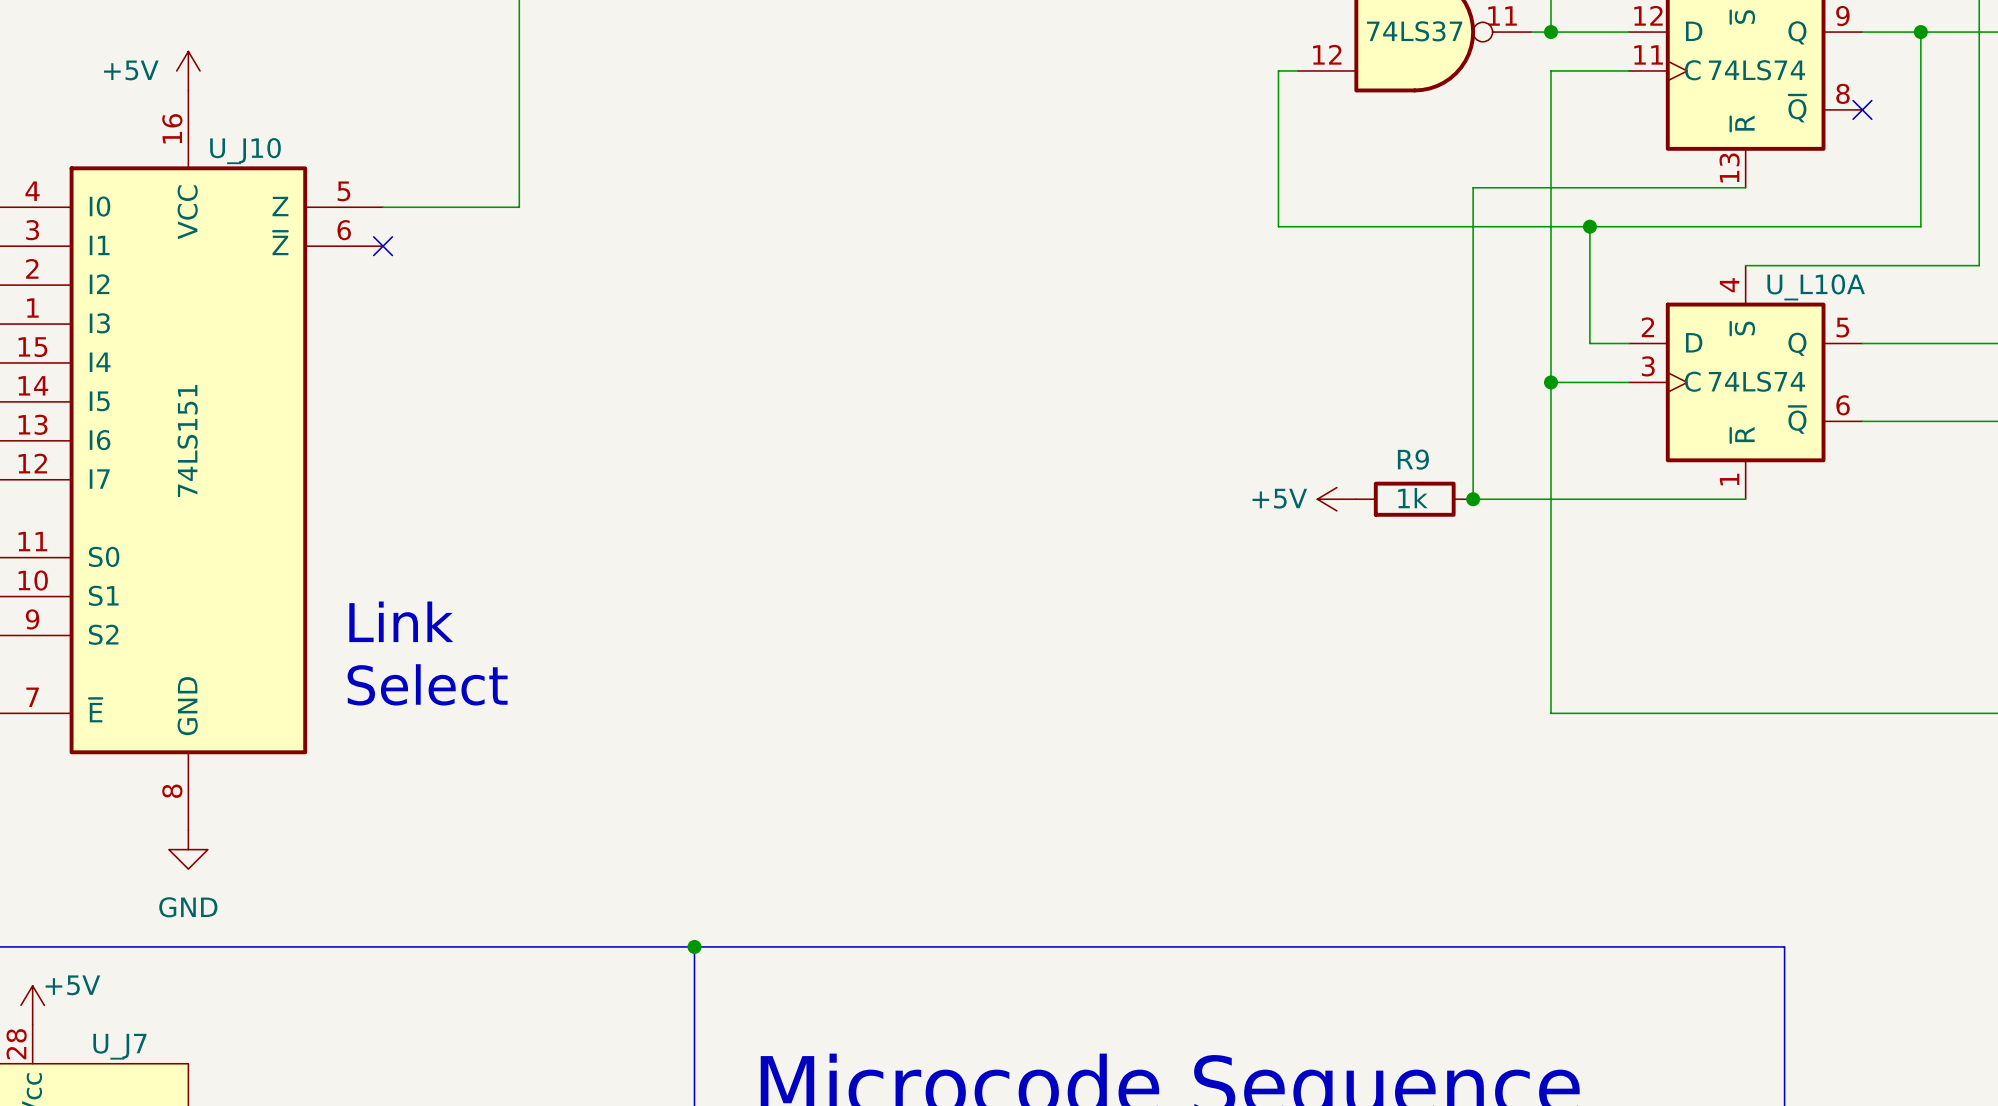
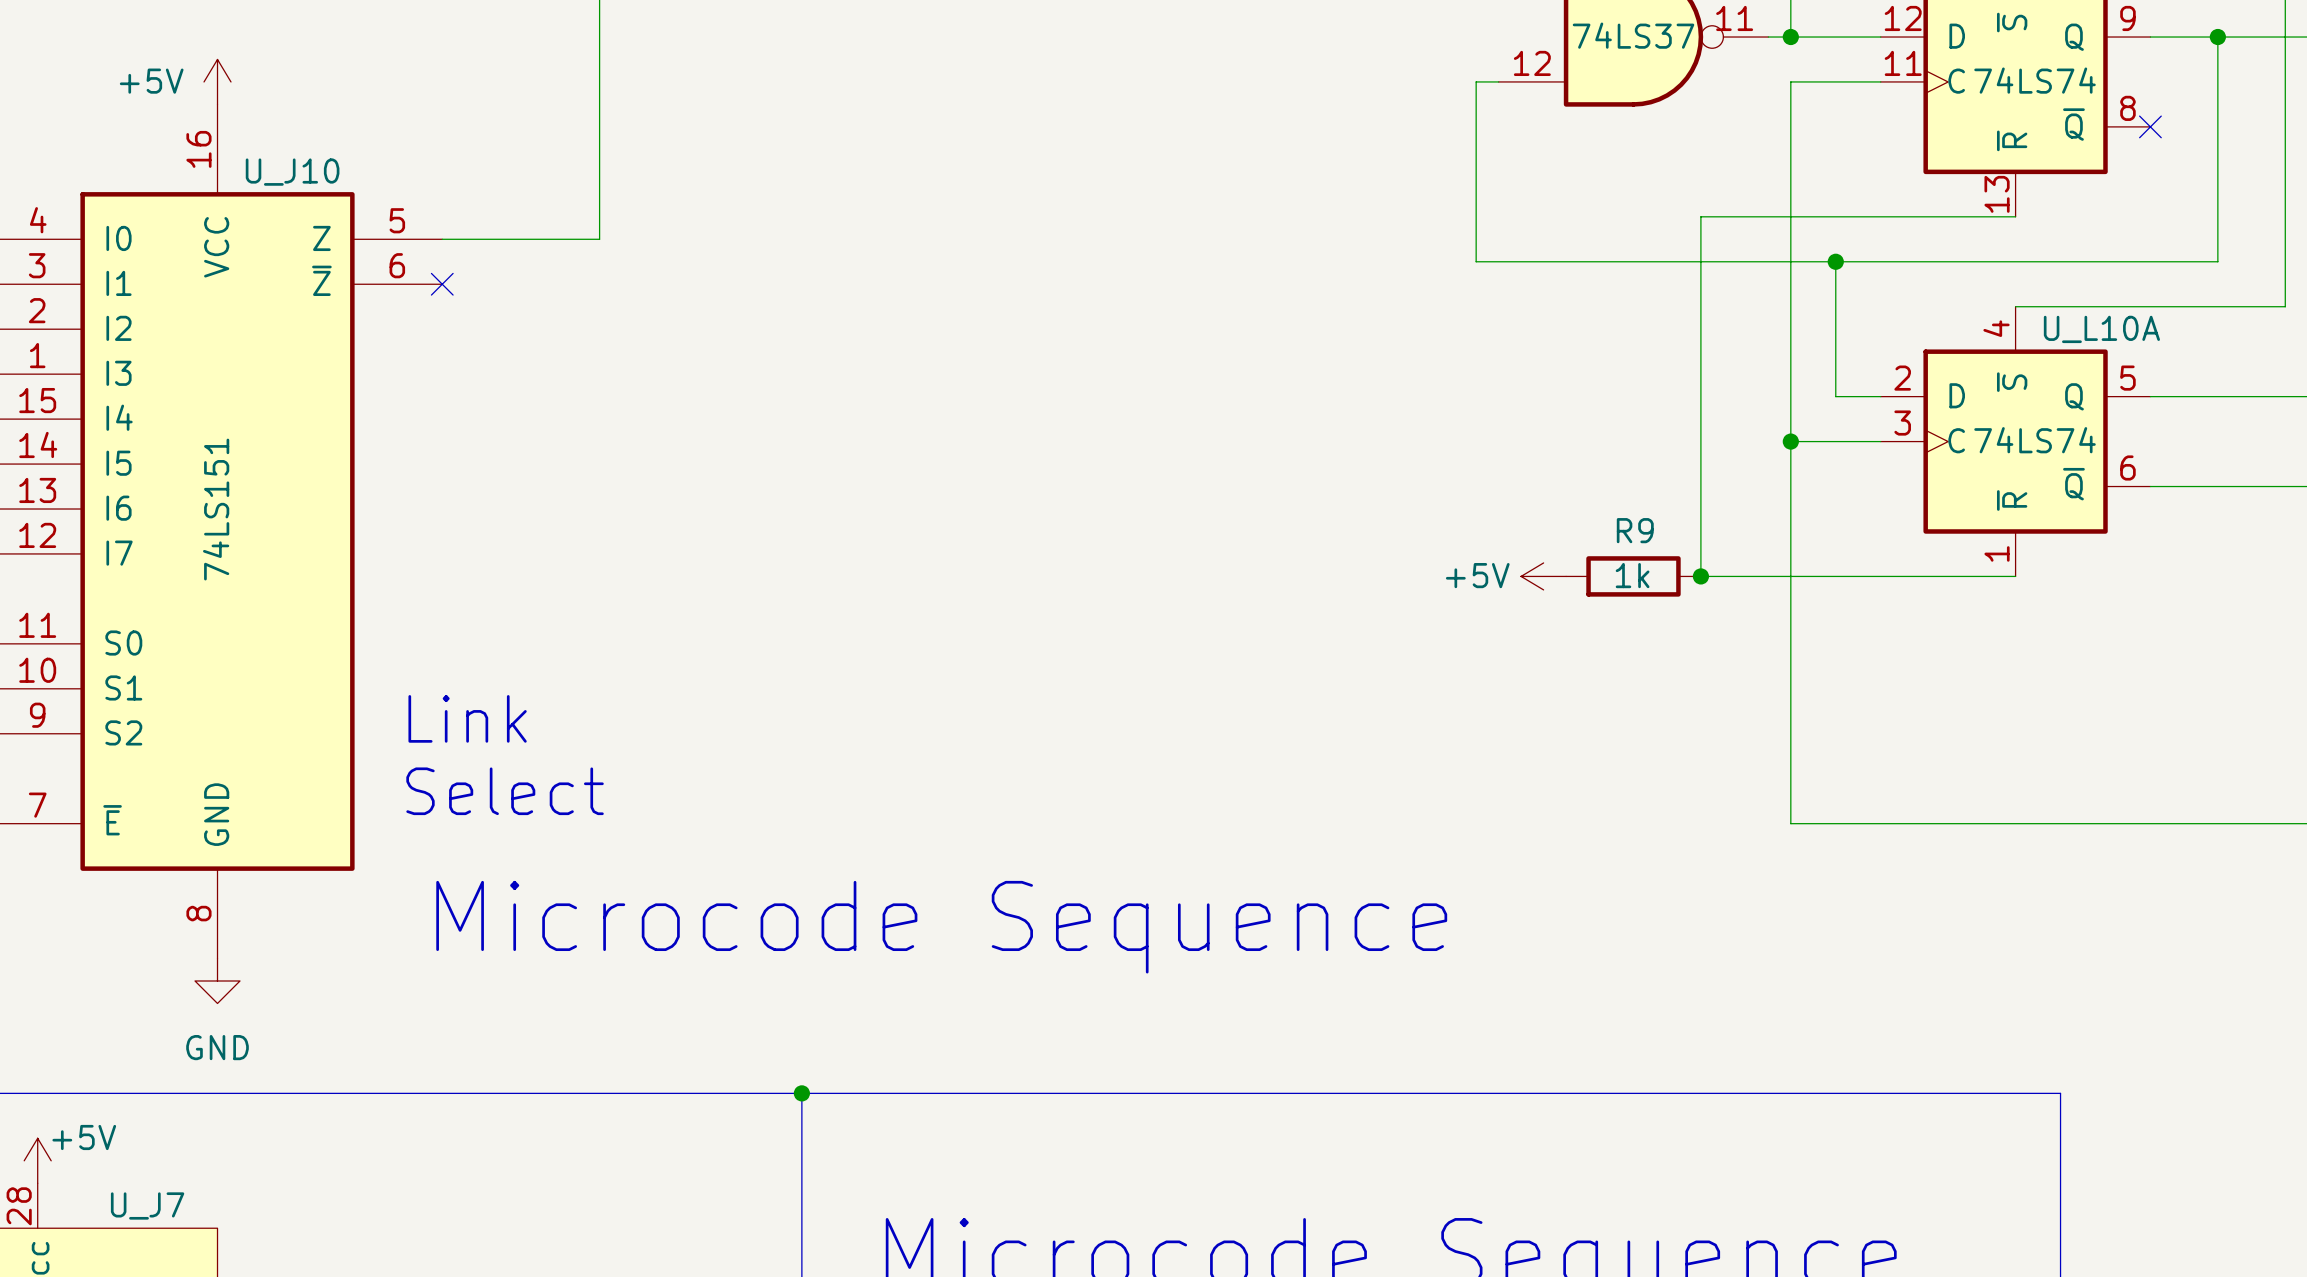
text: none -> Microcode Sequence (941, 927)

